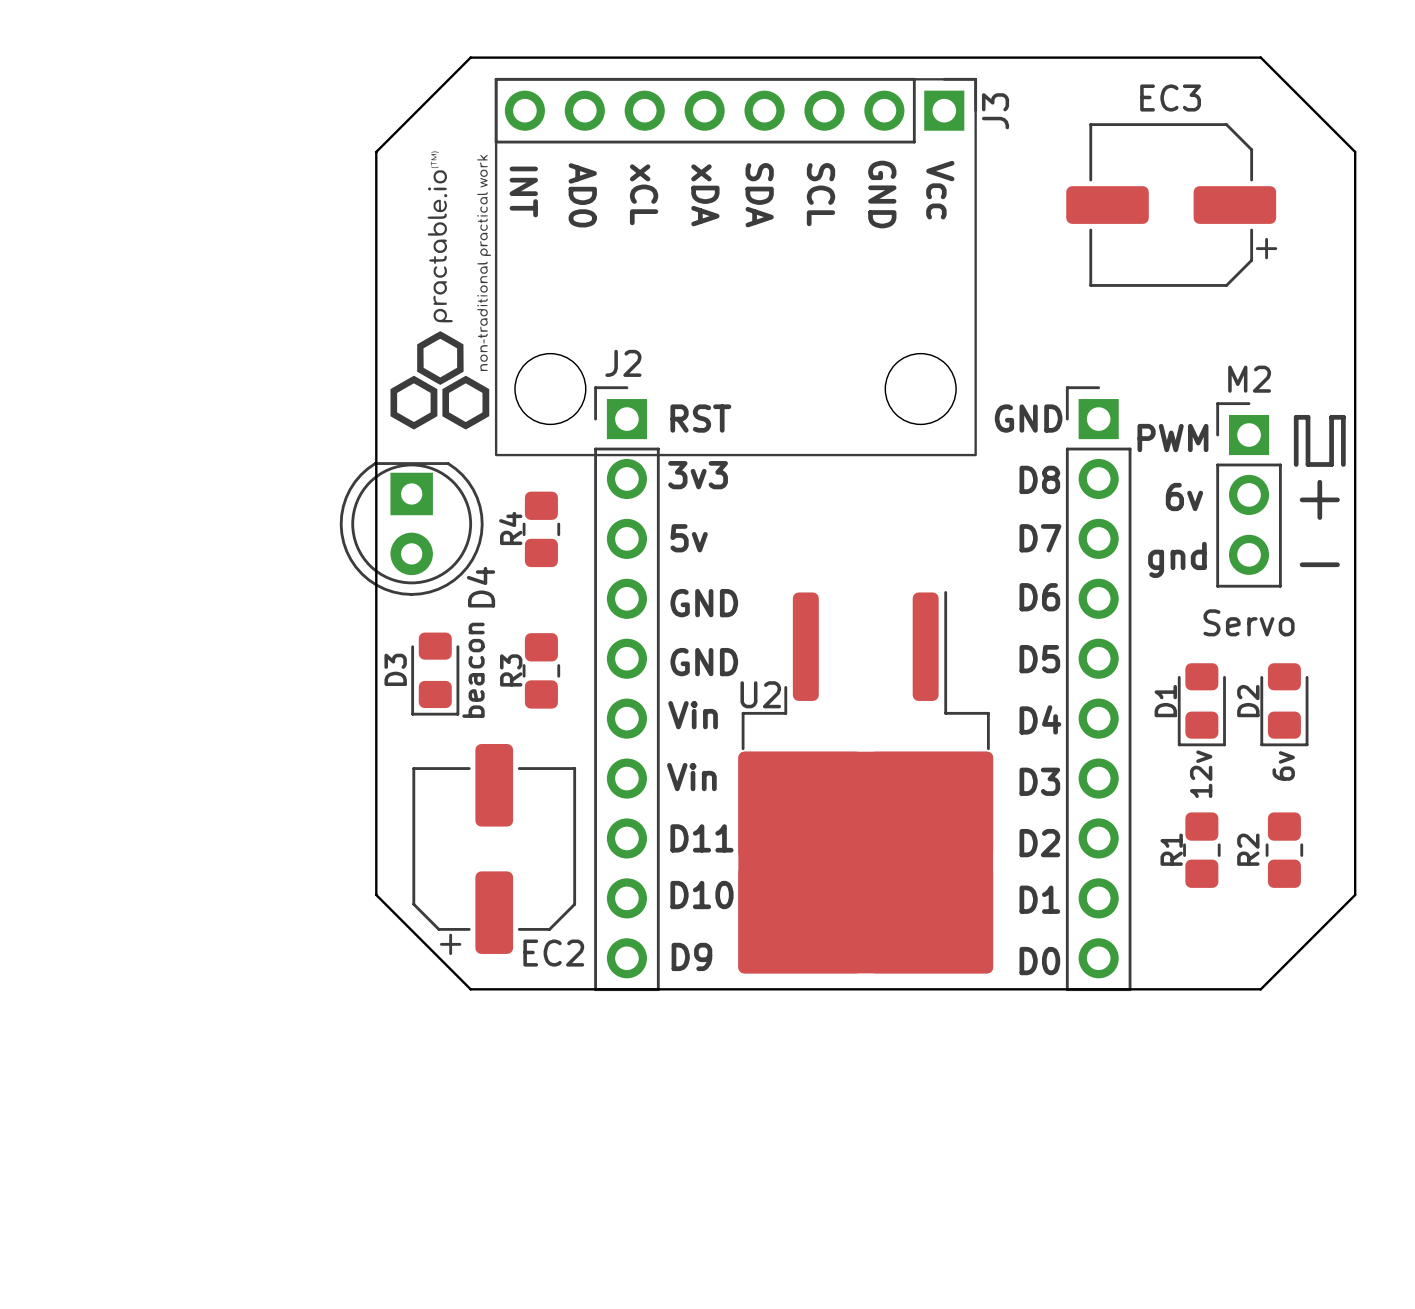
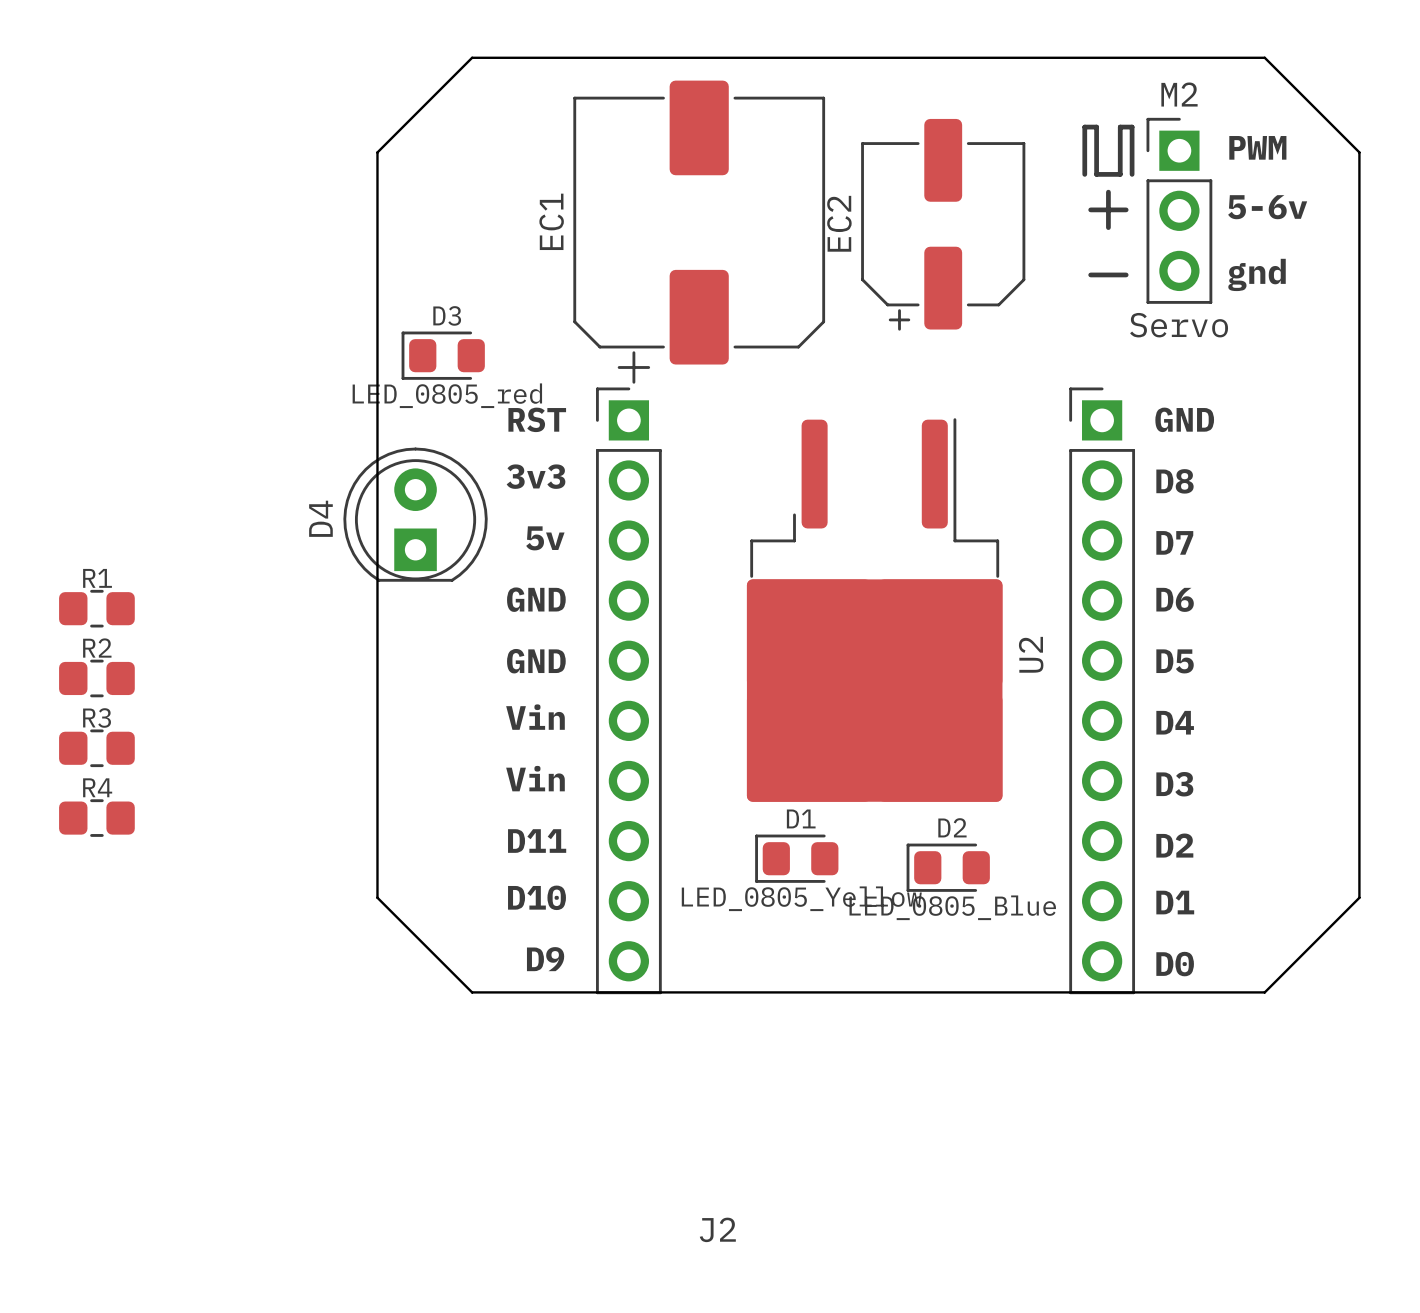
drawing: [390, 151, 491, 430] -> none
EC3: (1171, 205) -> none
EC1: none -> (699, 232)
J3: (735, 267) -> none
J2 name position: J2 (623, 363) -> J2 (717, 1229)
M2 name position: M2 (1249, 379) -> M2 (1179, 94)
J2 footprint: [594, 386, 1132, 992] -> [596, 387, 1136, 995]
M2 footprint: [1216, 402, 1346, 588] -> [1082, 117, 1213, 304]
D4 footprint: [339, 462, 484, 596] -> [343, 447, 488, 582]
R4 rotation: 0° (541, 529) -> 90° clockwise (96, 818)
R4 position: (541, 529) -> (96, 818)
D4 name position: D4 (481, 587) -> D4 (320, 518)
M2 value position: Servo (1249, 622) -> Servo (1179, 325)
D3 value: beacon (473, 670) -> LED_0805_red (447, 395)
R3 rotation: 0° (541, 670) -> 90° clockwise (96, 748)
R3 position: (541, 670) -> (96, 748)
D3 rotation: 0° (435, 674) -> 90° clockwise (443, 355)
D3 position: (435, 674) -> (443, 355)
U2 name rotation: 0° (760, 694) -> 90° counterclockwise (1031, 654)
U2 name position: U2 (760, 694) -> U2 (1031, 654)
D1 rotation: 0° (1201, 704) -> 90° clockwise (796, 858)
D1 position: (1201, 704) -> (796, 858)
D2 rotation: 0° (1284, 704) -> 90° clockwise (948, 867)
D2 position: (1284, 704) -> (948, 867)
D2 value: 6v (1283, 765) -> LED_0805_Blue (952, 907)
D1 value: 12v (1201, 774) -> LED_0805_Yellow (801, 898)
U2 position: (865, 782) -> (874, 610)
EC2 position: (494, 849) -> (943, 224)
R1 rotation: 0° (1201, 850) -> 90° clockwise (96, 608)
R1 position: (1201, 850) -> (96, 608)
R2 rotation: 0° (1284, 850) -> 90° clockwise (96, 678)
R2 position: (1284, 850) -> (96, 678)
EC2 name rotation: 0° (553, 953) -> 90° counterclockwise (839, 223)
EC2 name position: EC2 (553, 953) -> EC2 (839, 223)

